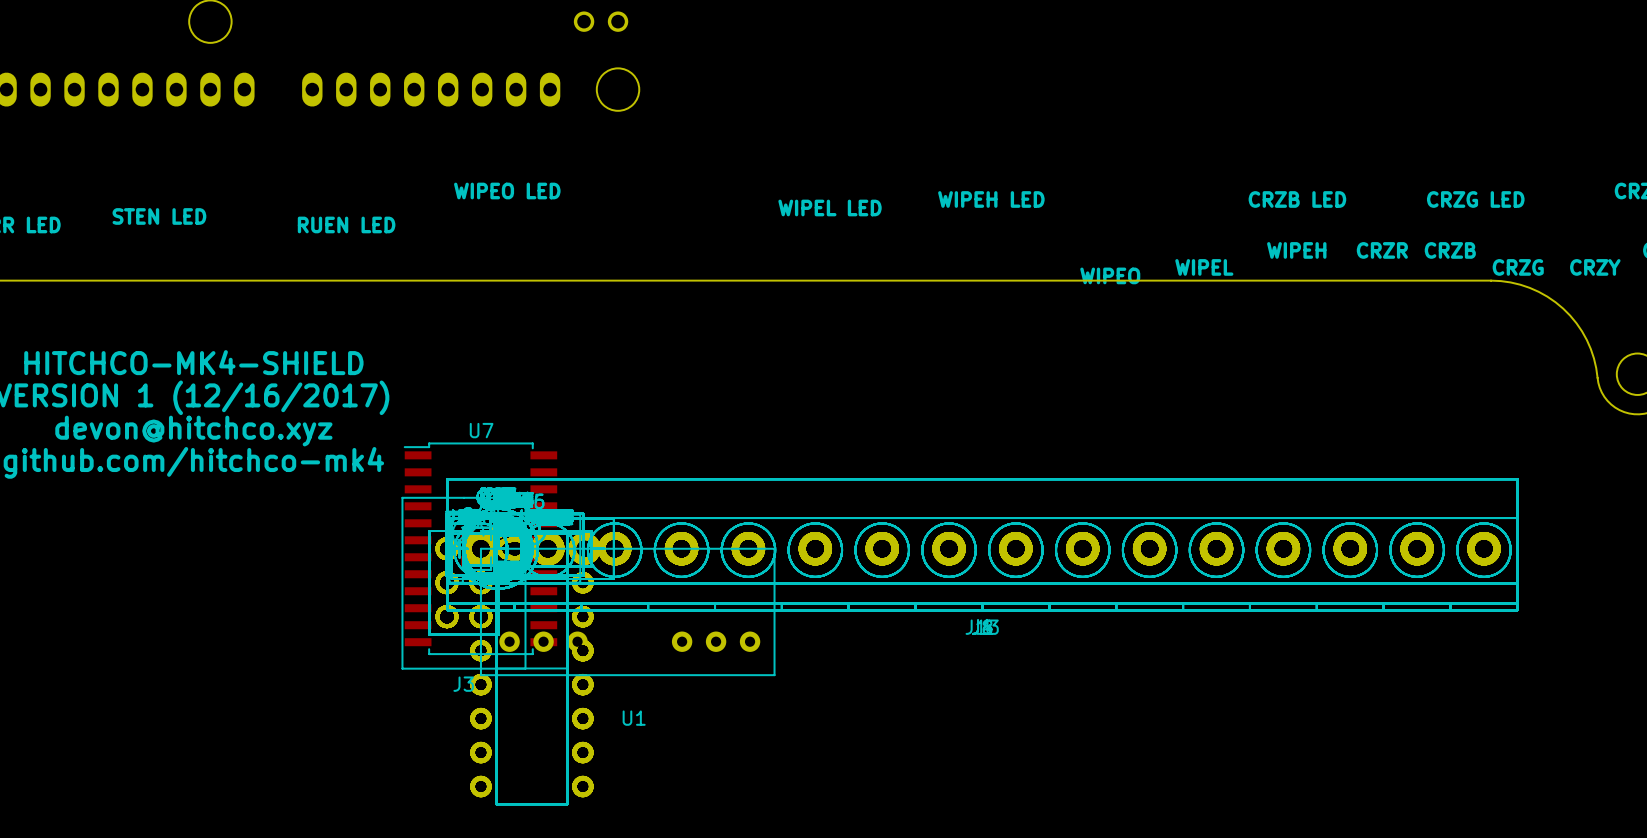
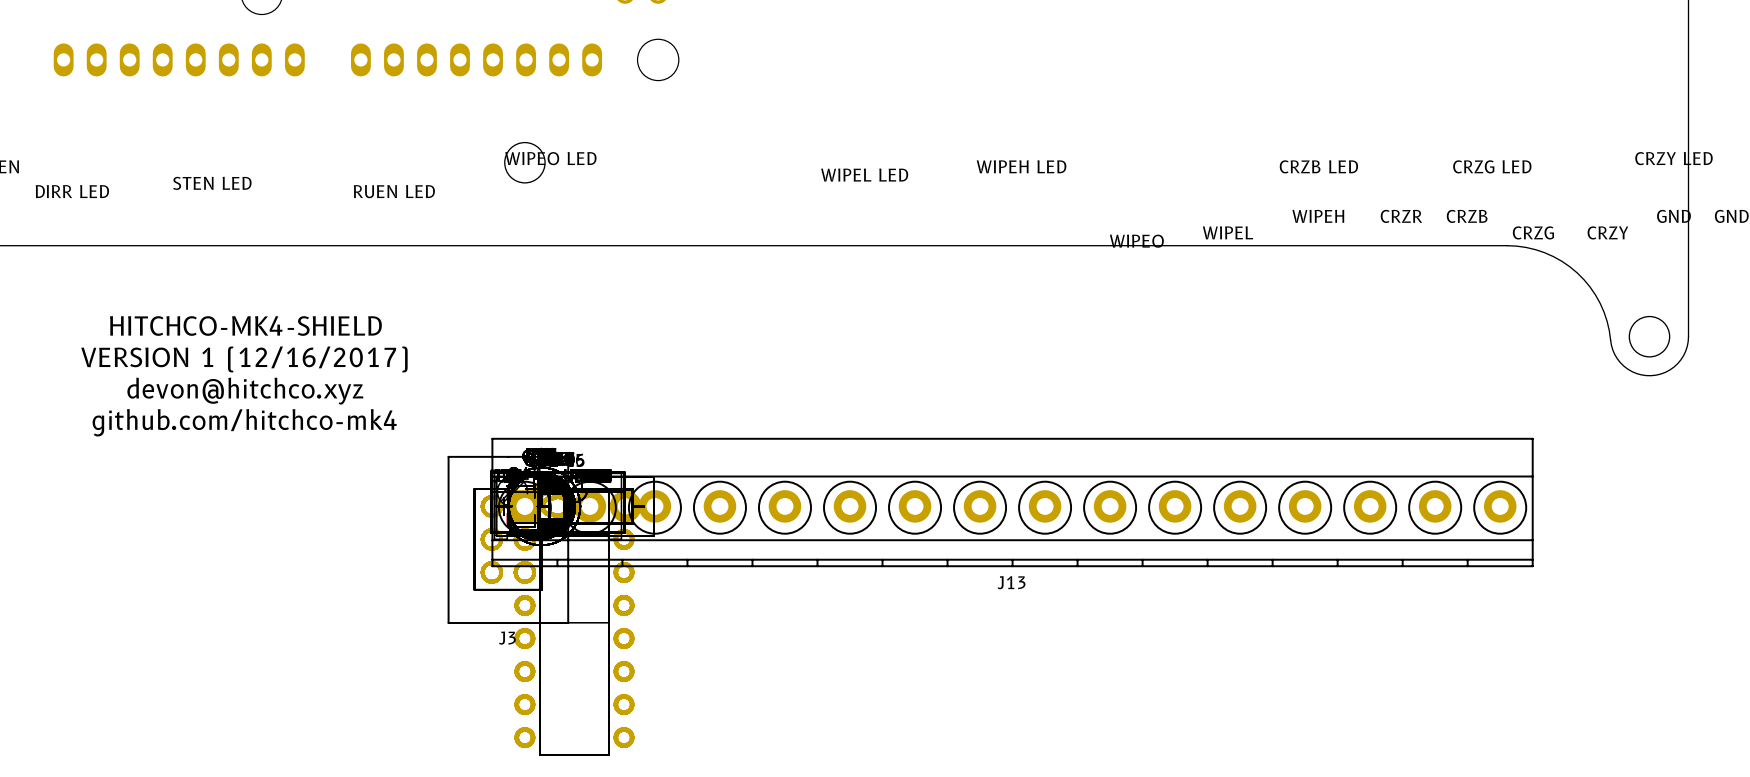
round board edge: none -> [504, 141, 546, 184]
part: (982, 544) -> none
part: (982, 544) -> none
part: (982, 544) -> none
U7: (480, 548) -> none
U1: (627, 611) -> none

